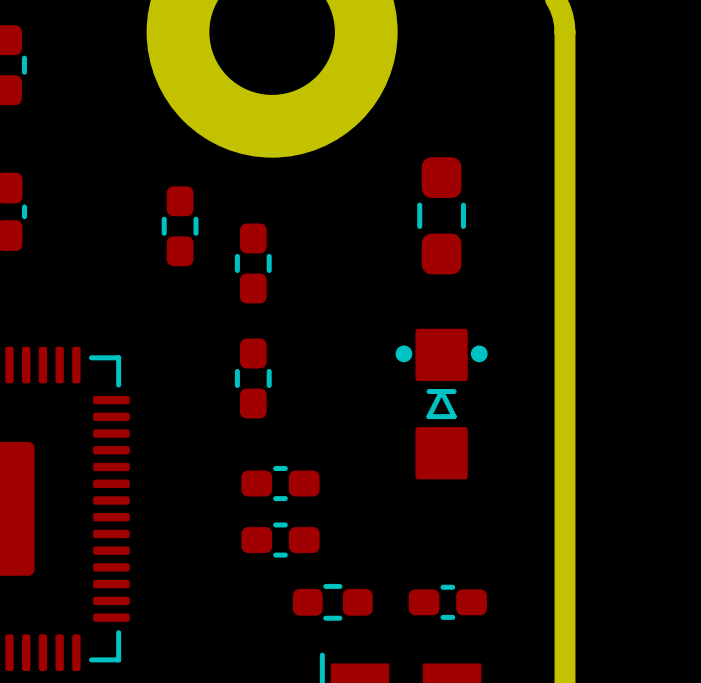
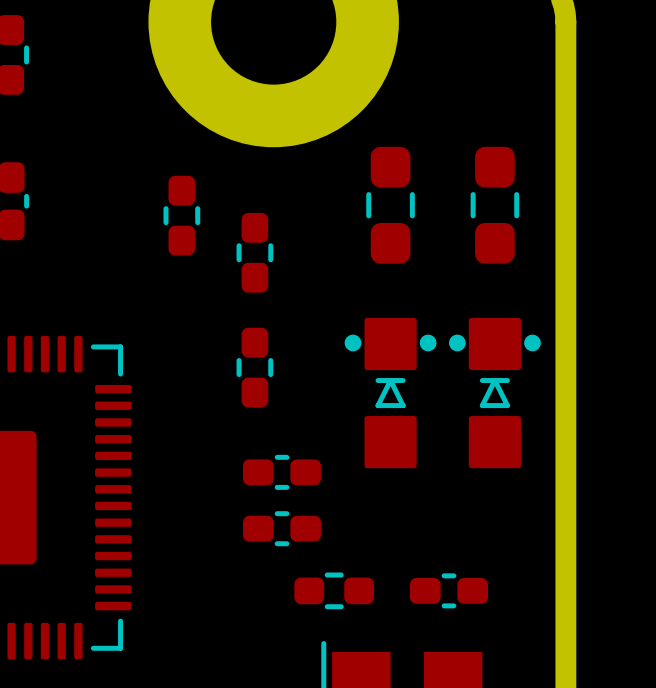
part: none -> (390, 205)
part: (441, 215) -> none
part: none -> (494, 205)
part: none -> (390, 393)
part: (441, 404) -> none
part: none -> (494, 393)

